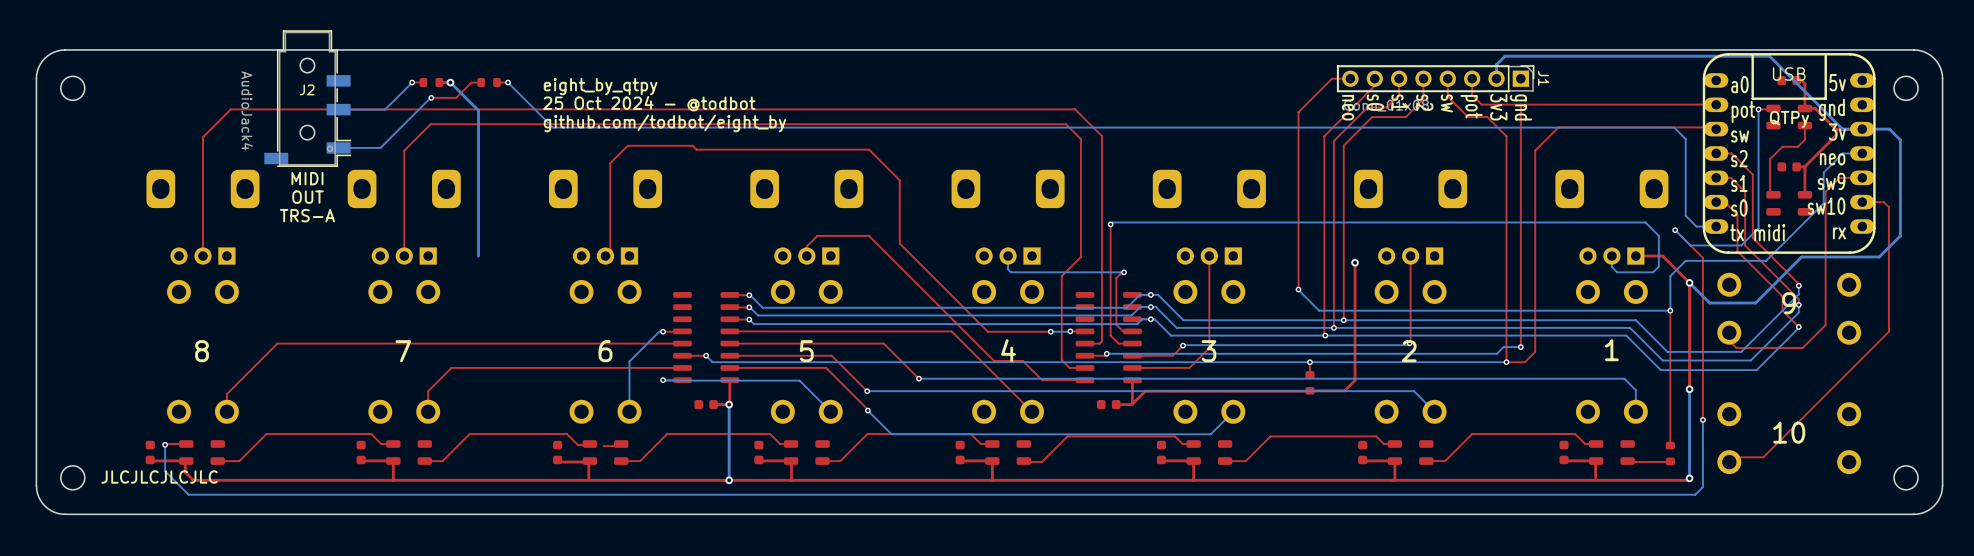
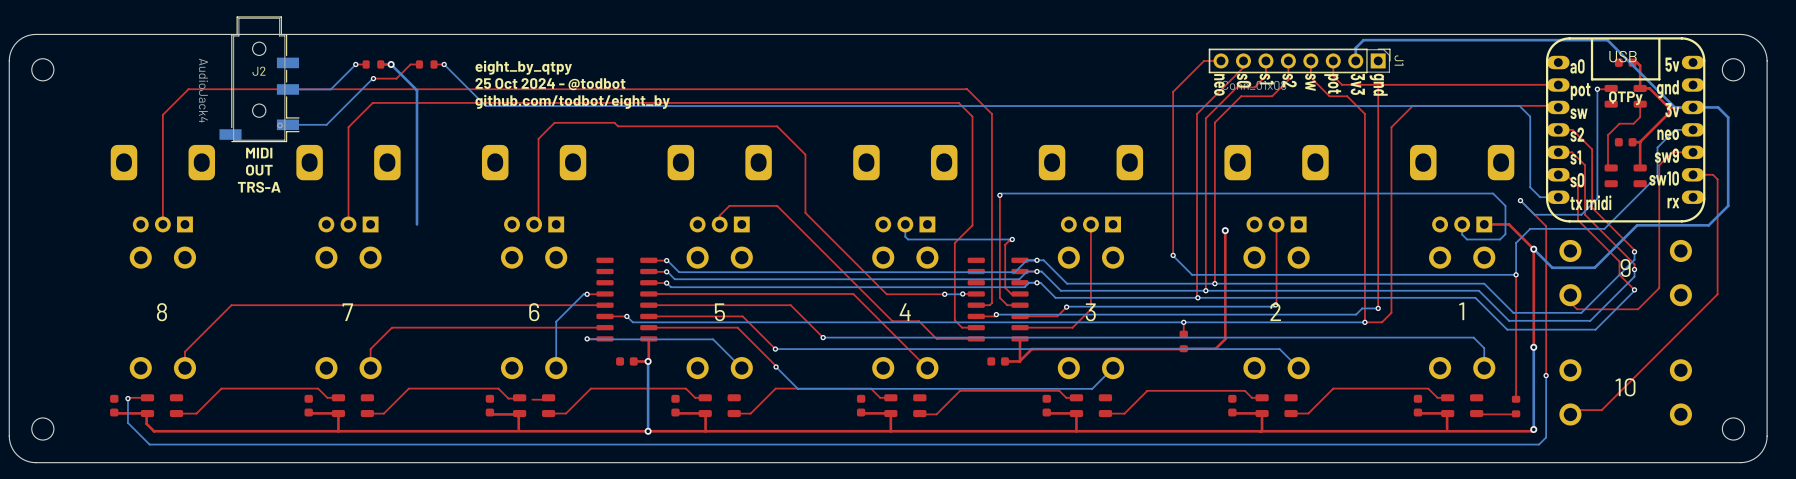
text: JLCJLCJLCJLC (159, 477) -> none

